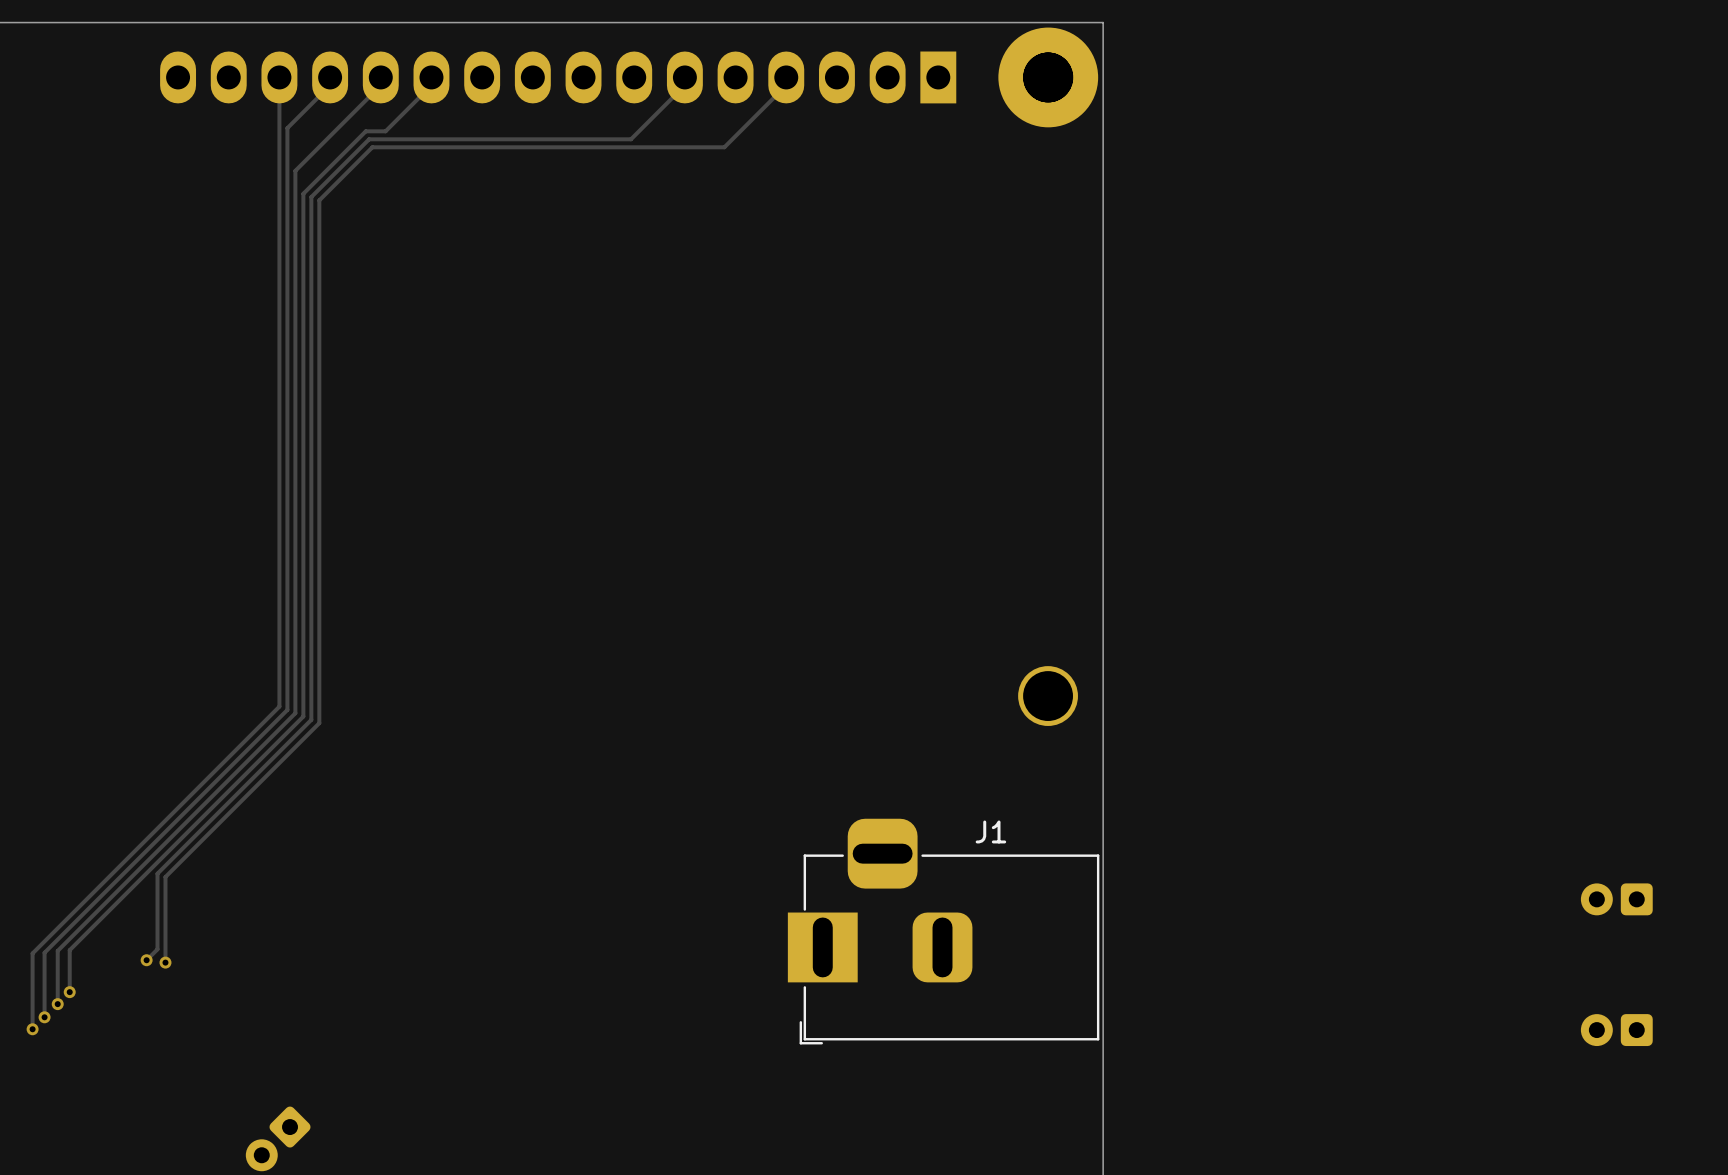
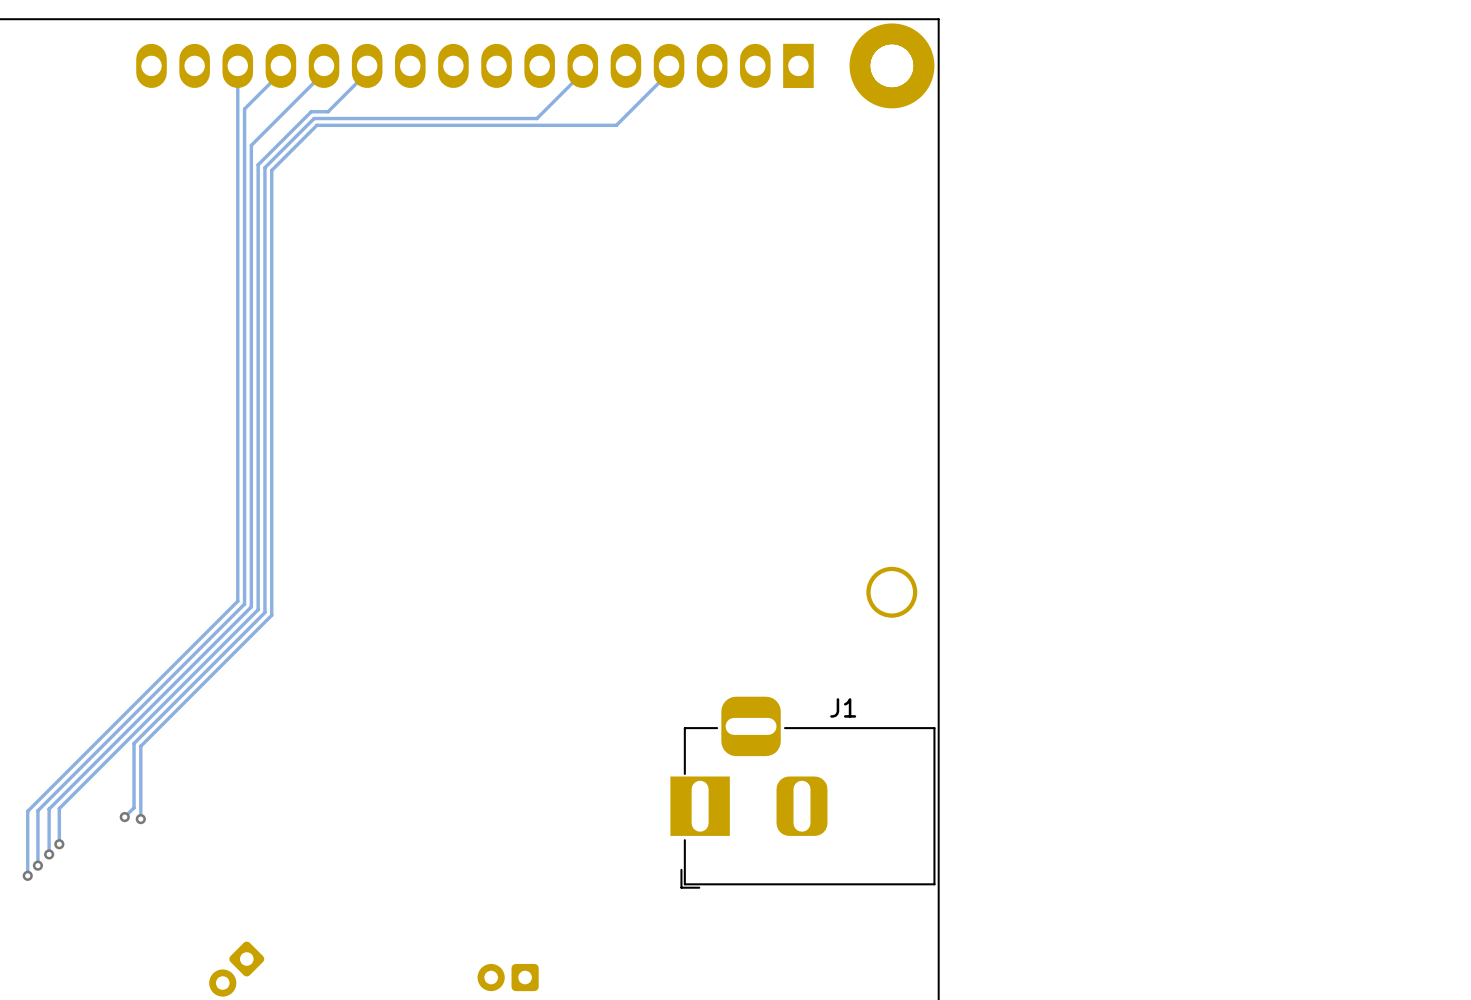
part: (1616, 899) -> none
part: (1616, 1030) -> none
part: none -> (508, 977)

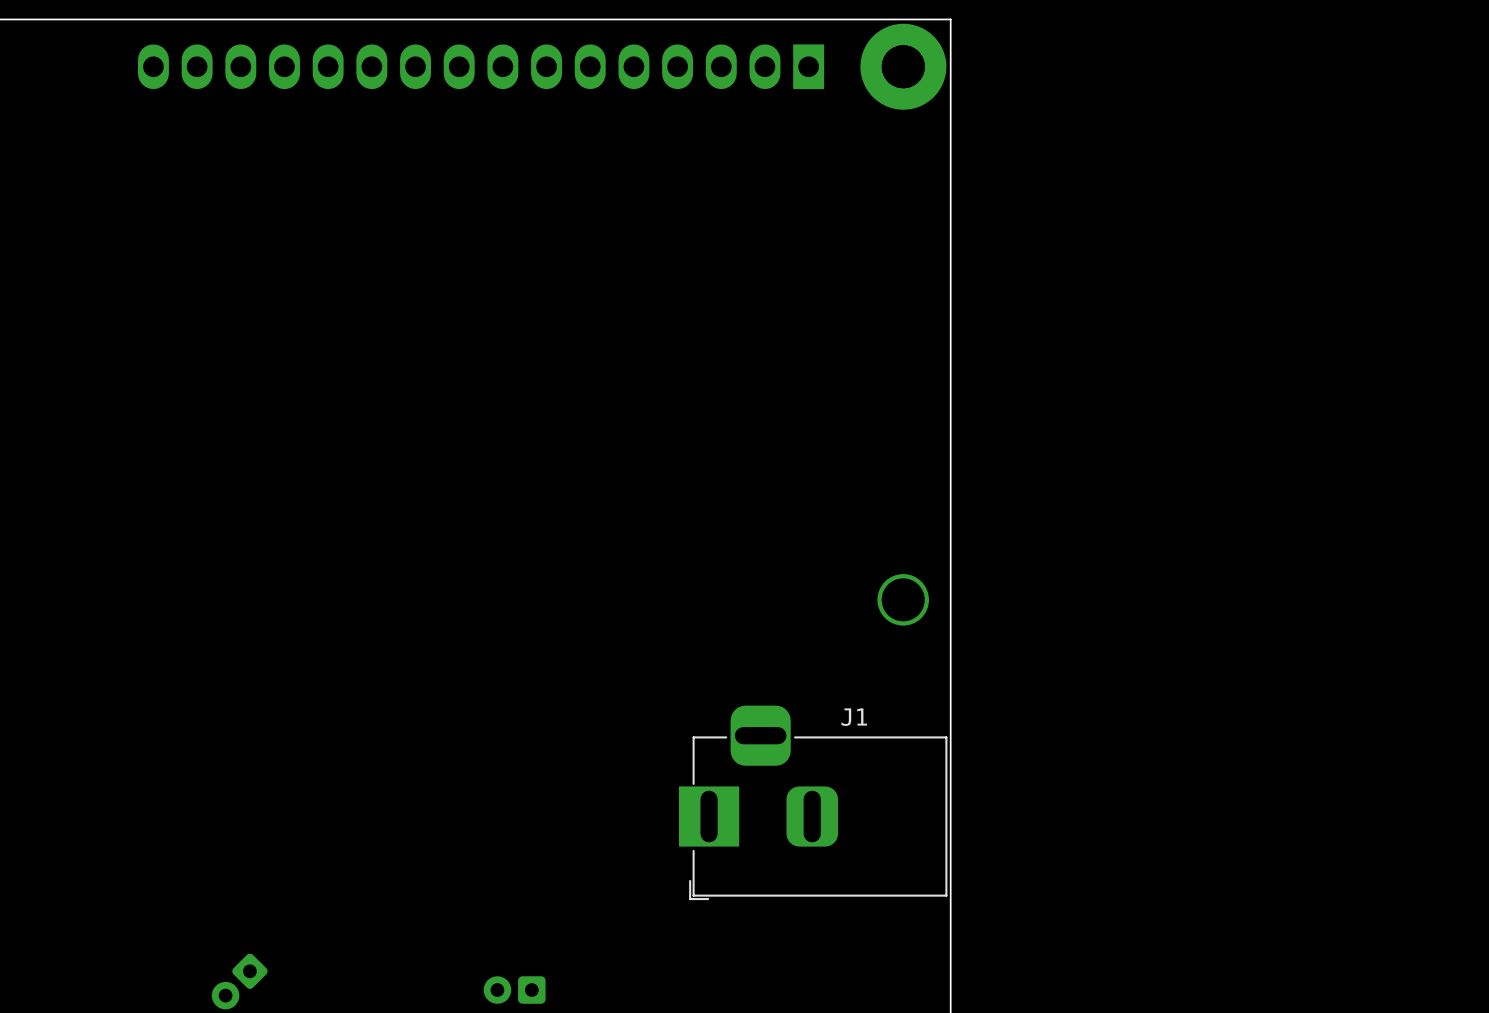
track: (237, 65) (237, 601) (27, 811) (27, 875) -> none
track: (280, 65) (280, 72) (244, 109) (244, 604) (37, 810) (37, 865) -> none
track: (324, 65) (324, 72) (251, 145) (251, 606) (49, 809) (49, 854) -> none
track: (367, 65) (367, 72) (328, 111) (311, 111) (258, 164) (258, 609) (59, 808) (59, 844) -> none
track: (582, 65) (582, 72) (536, 118) (314, 118) (264, 167) (264, 612) (134, 743) (134, 807) (124, 817) -> none
track: (669, 65) (669, 72) (616, 125) (316, 125) (271, 170) (271, 615) (140, 746) (140, 819) -> none
via: (124, 817) -> none
via: (140, 819) -> none
via: (59, 844) -> none
via: (49, 854) -> none
via: (37, 865) -> none
via: (27, 875) -> none

